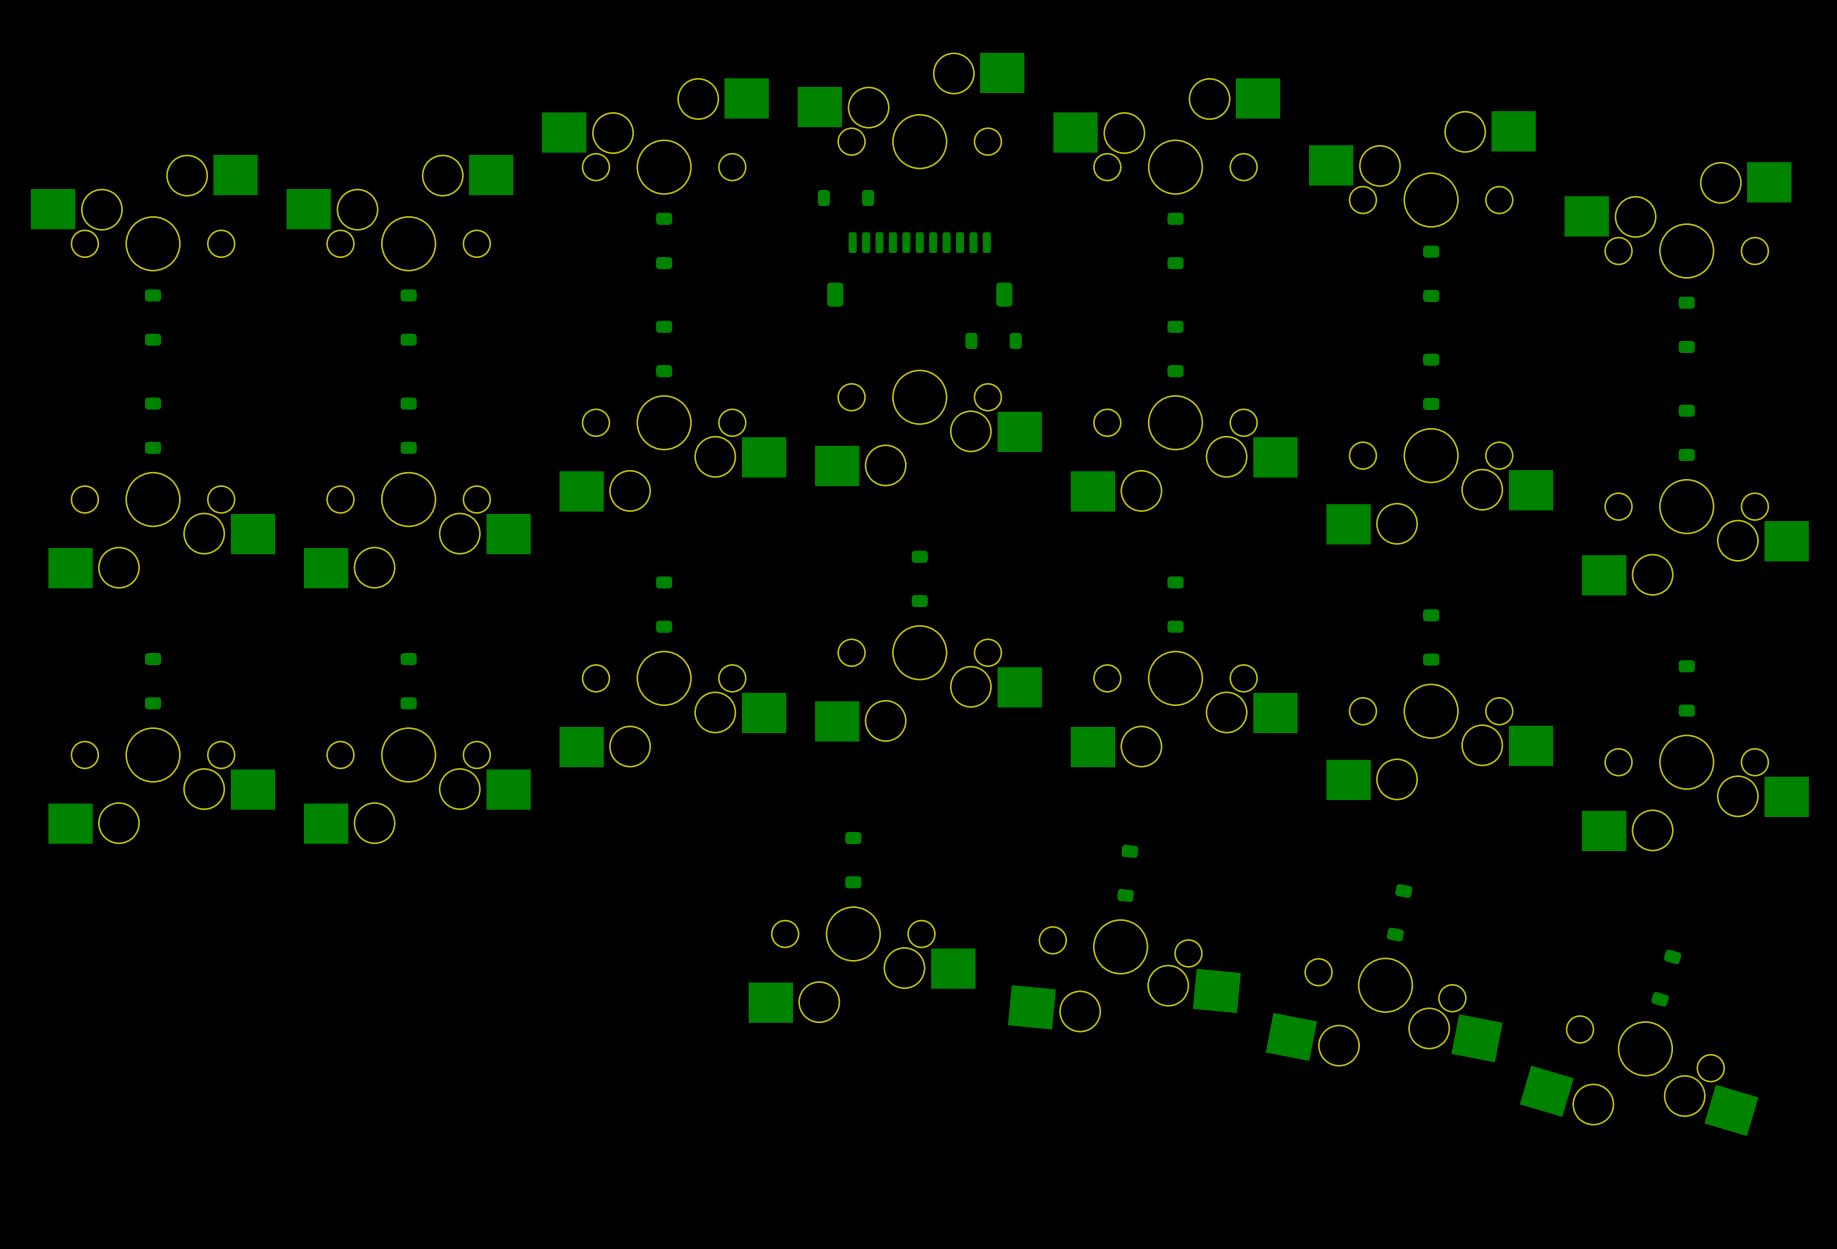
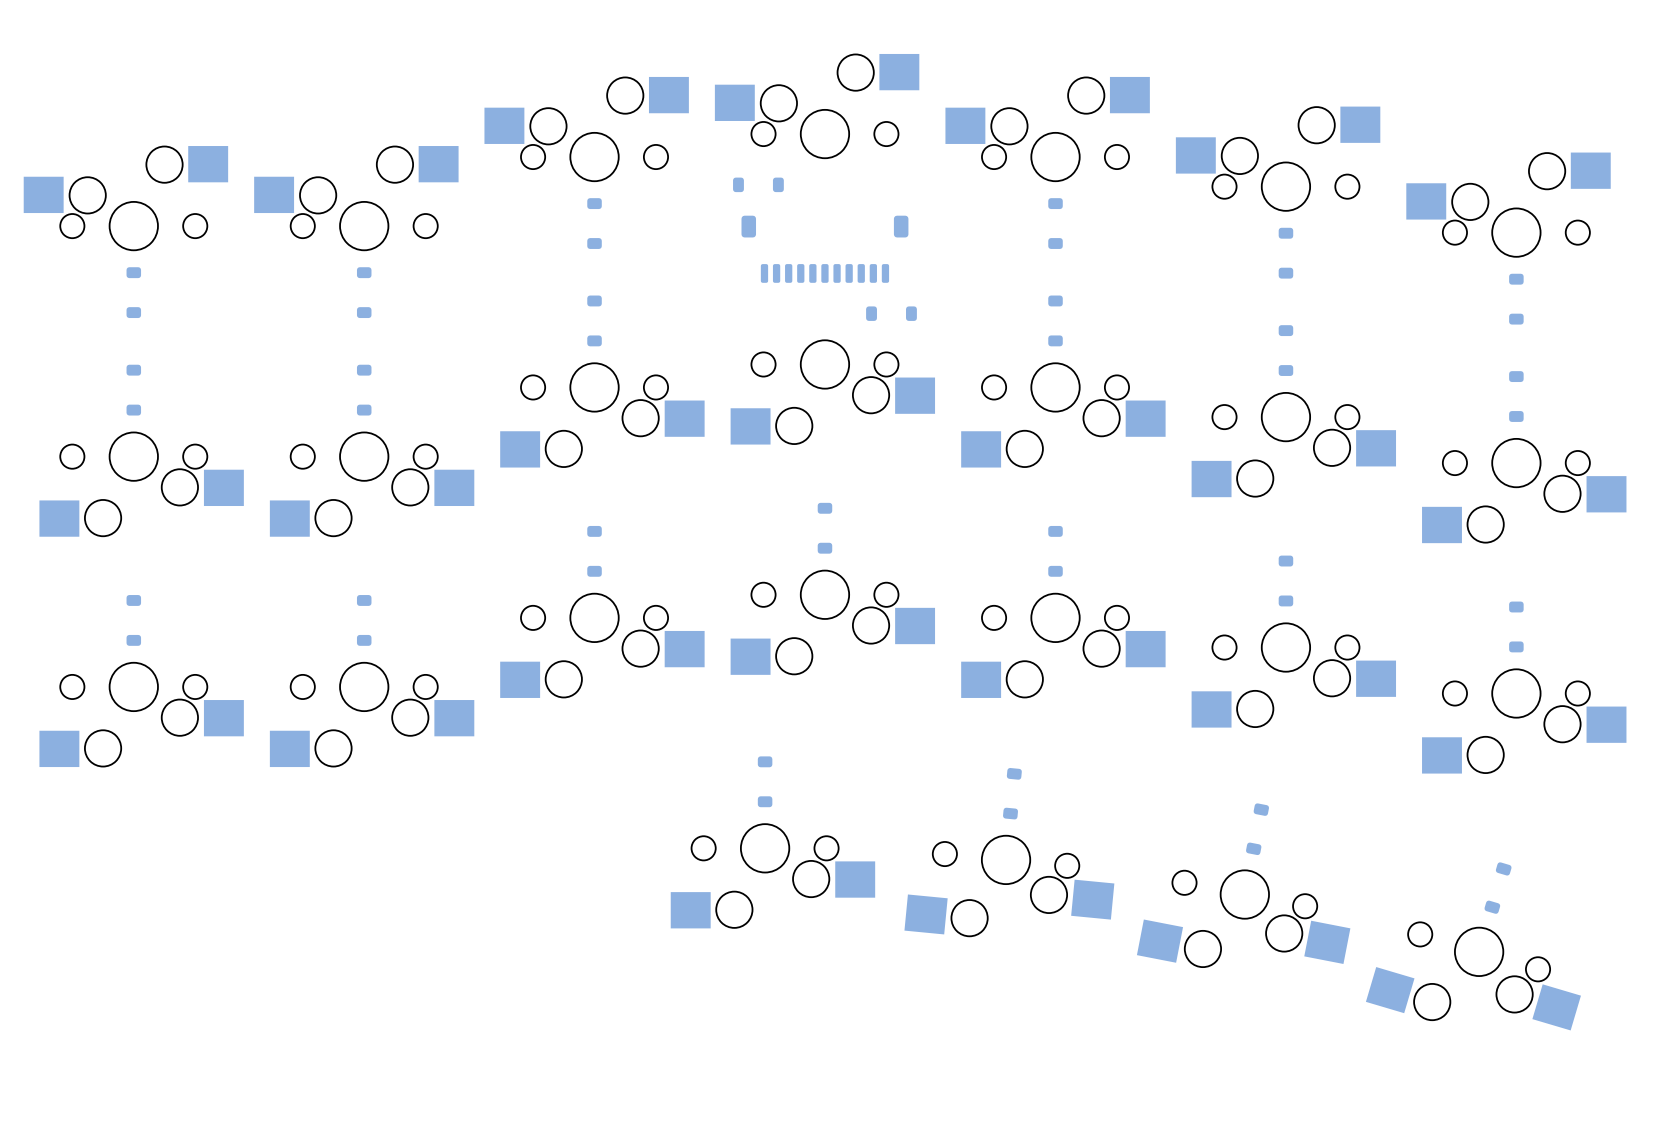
part rotation: 0° (919, 269) -> 180° (824, 249)

